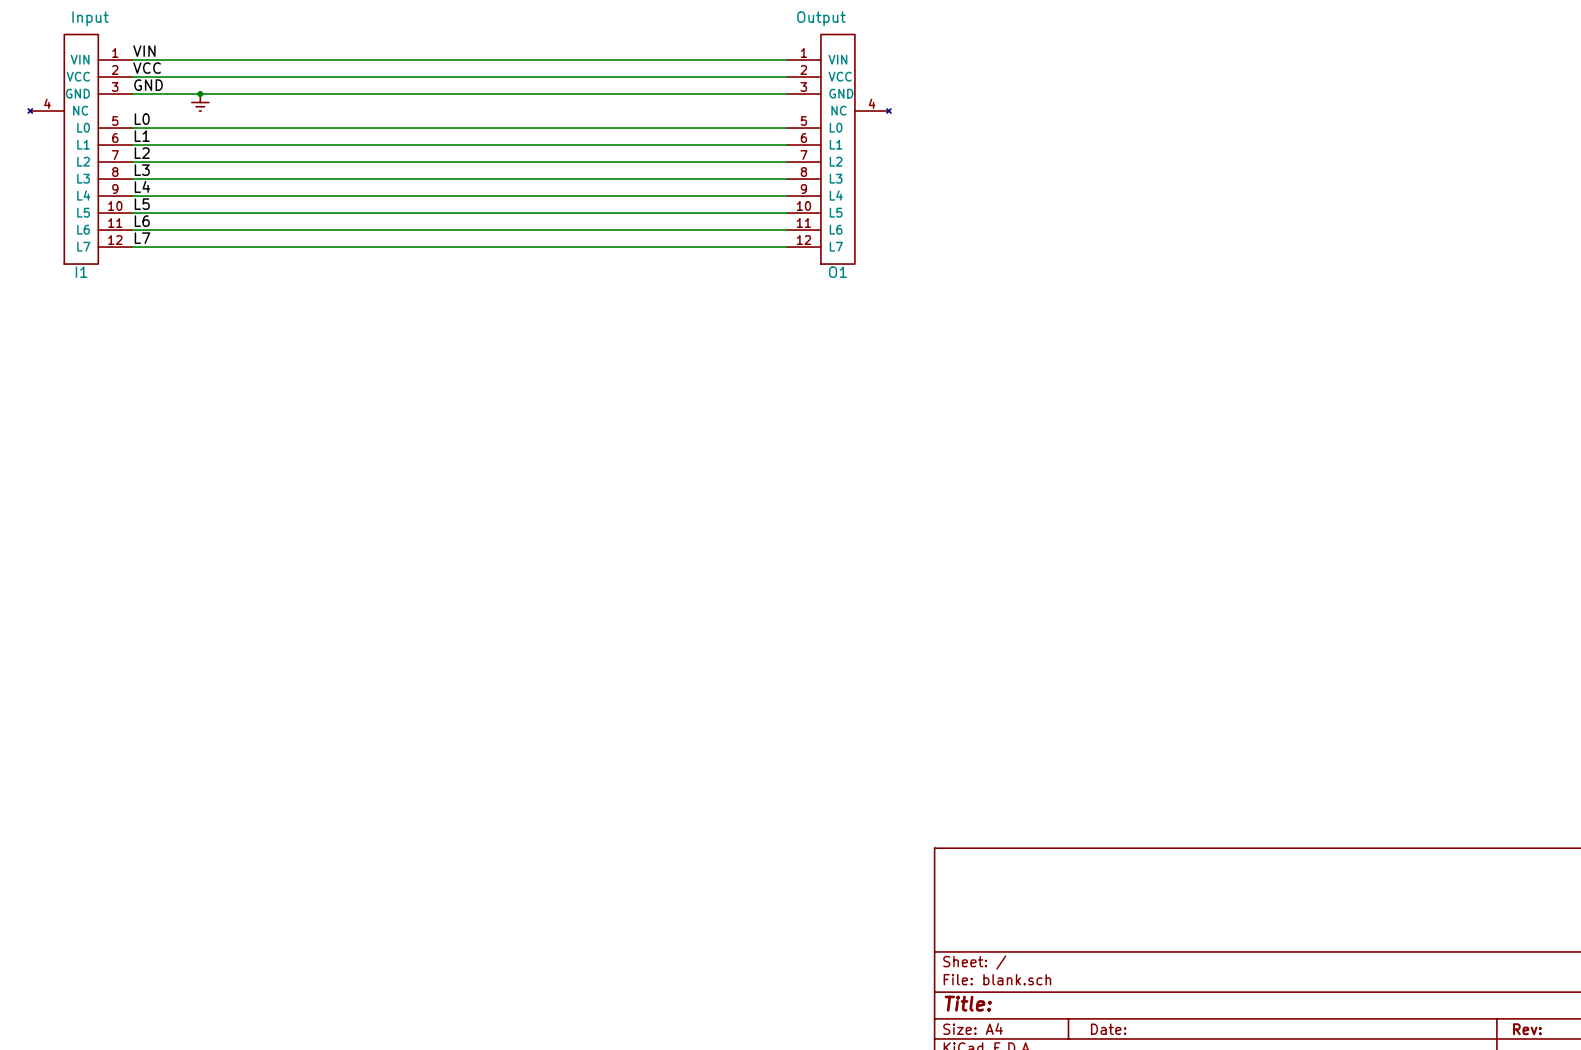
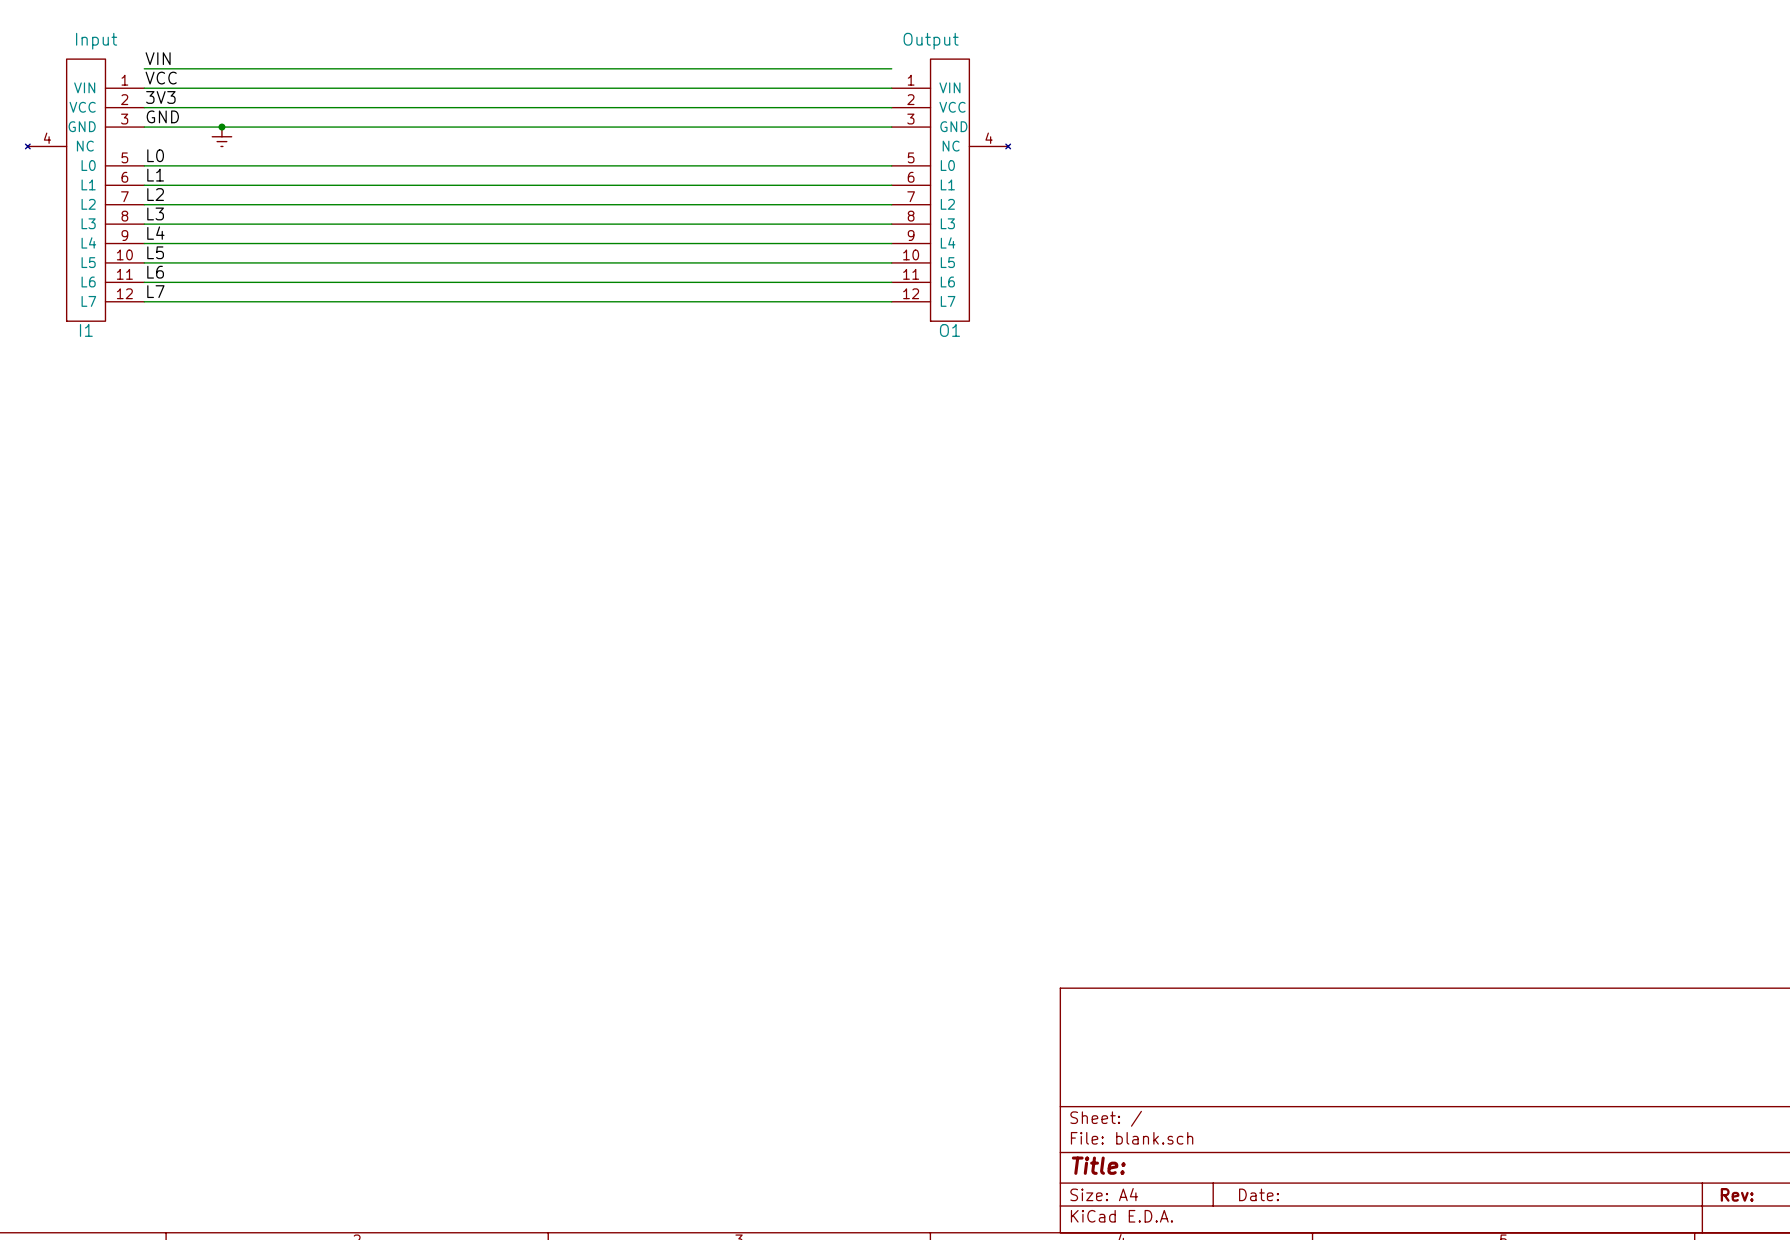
label: none -> VIN (158, 58)
wire: none -> (144, 68) (891, 68)
label: VIN (144, 51) -> VCC (161, 78)
label: VCC (147, 68) -> 3V3 (160, 97)

